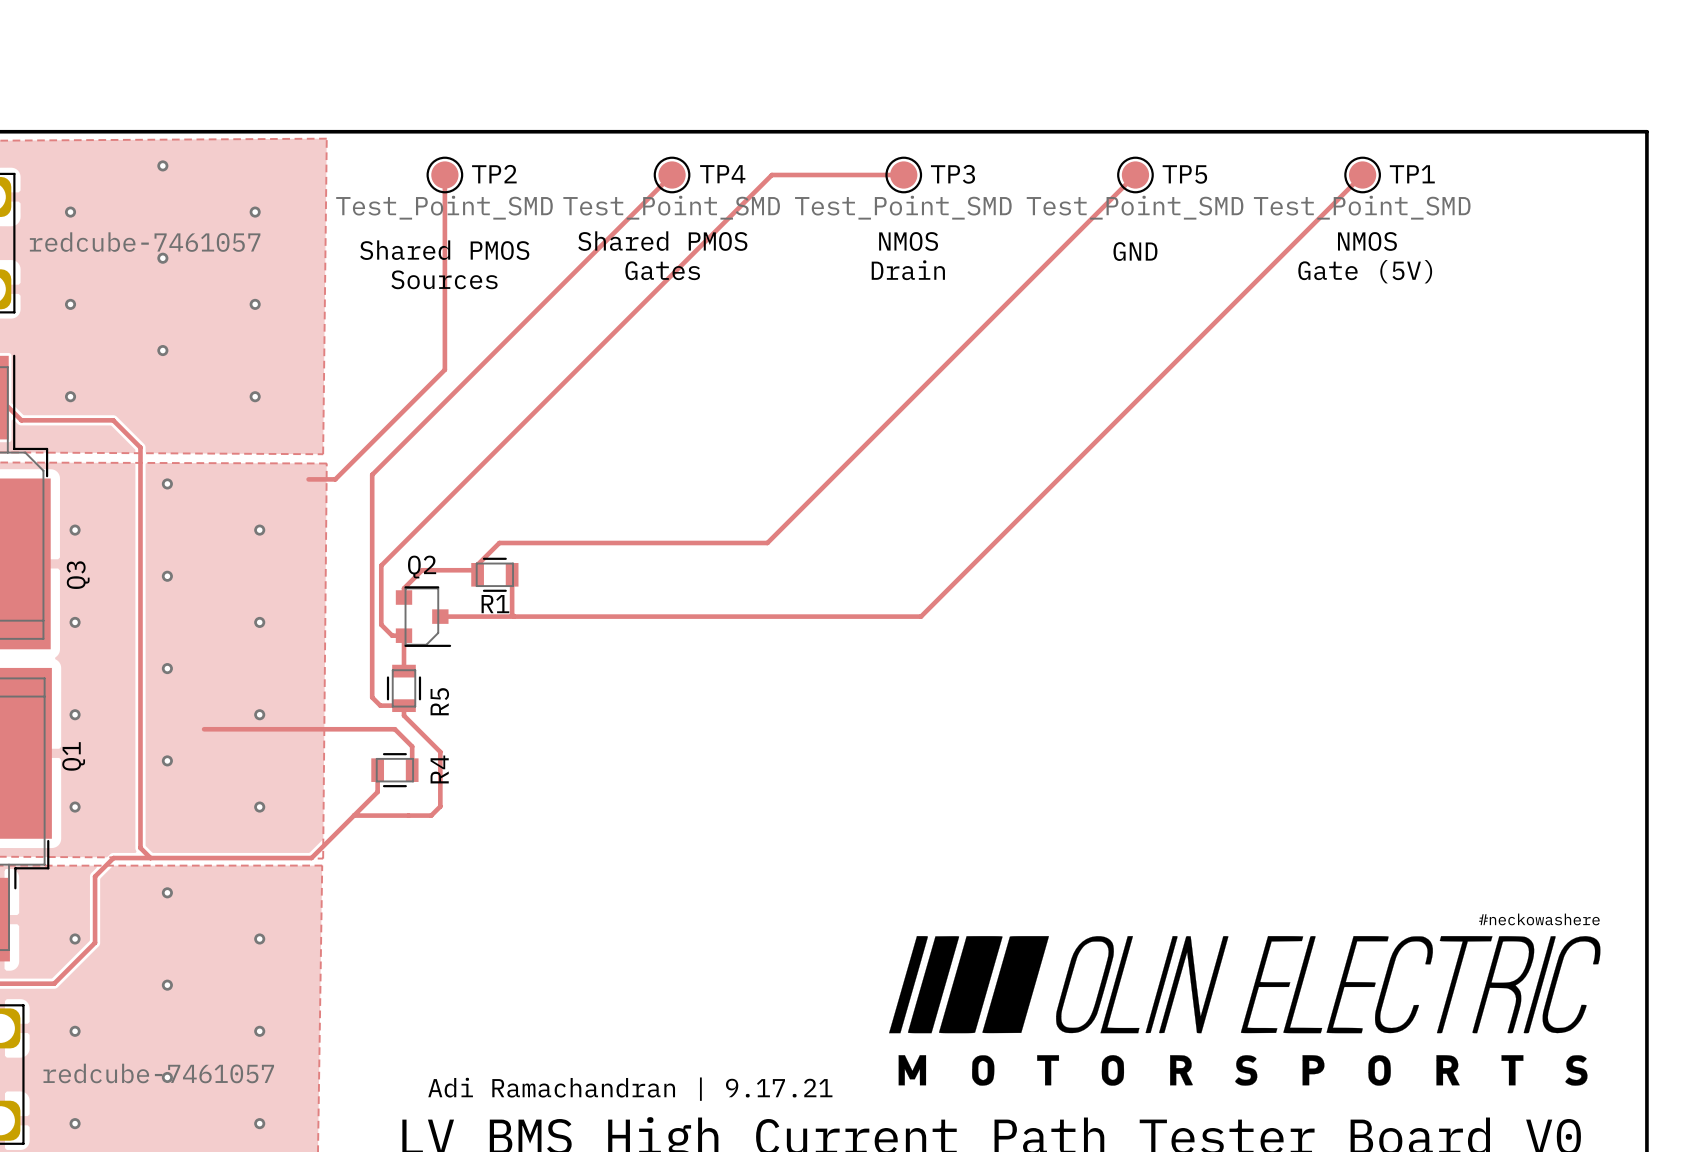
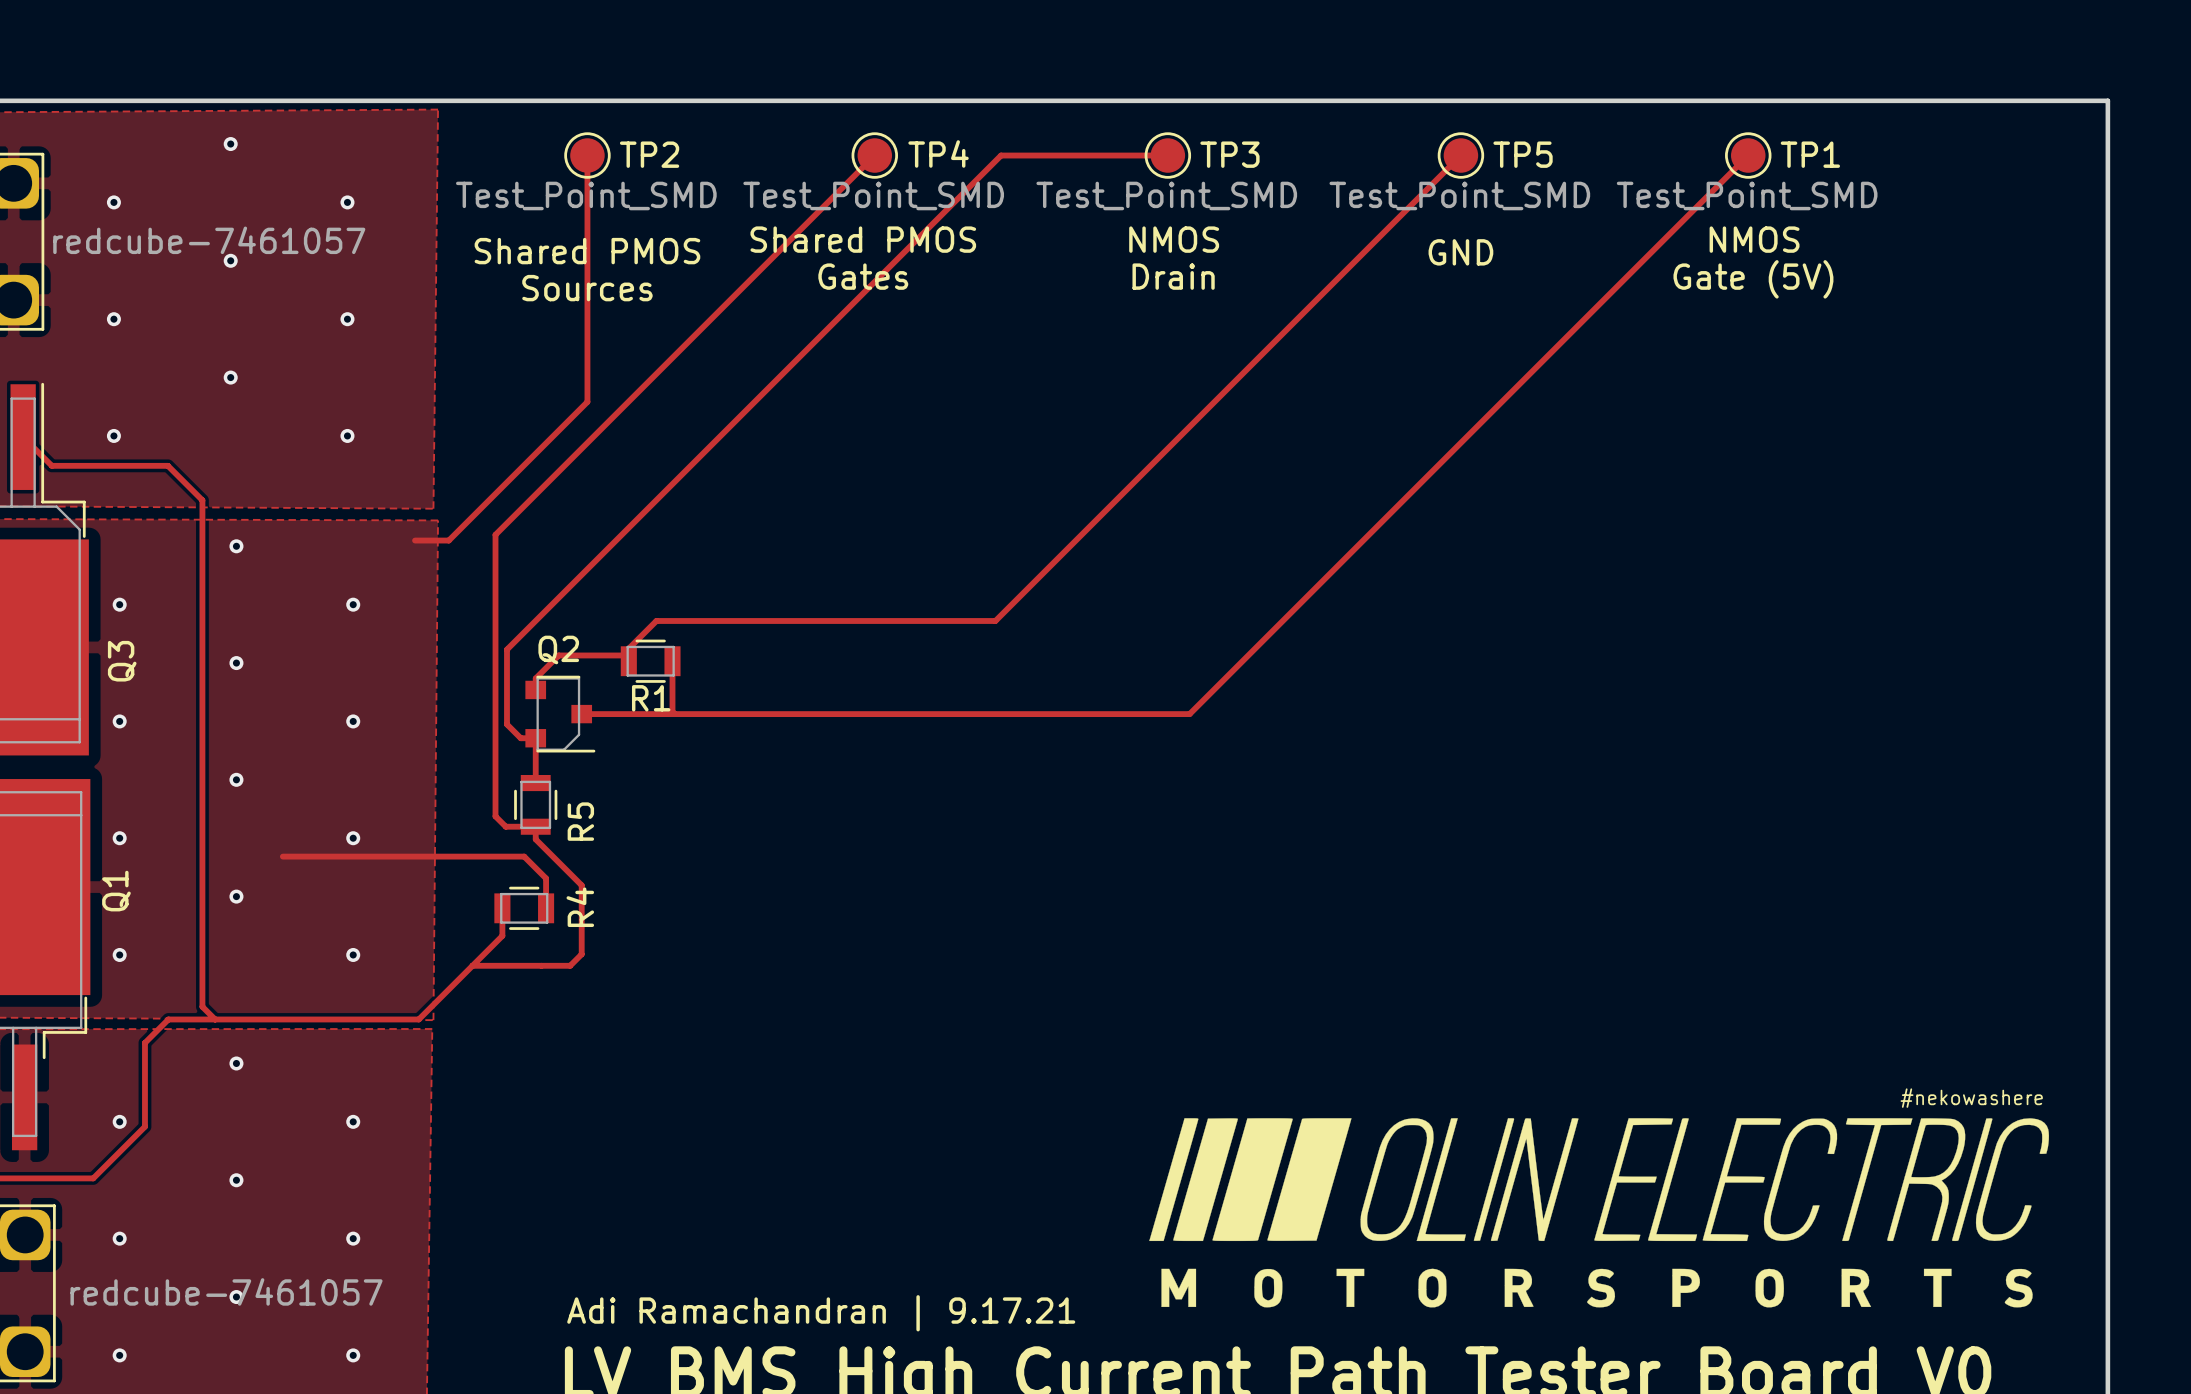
text: #neckowashere (1539, 919) -> #nekowashere (1971, 1098)

